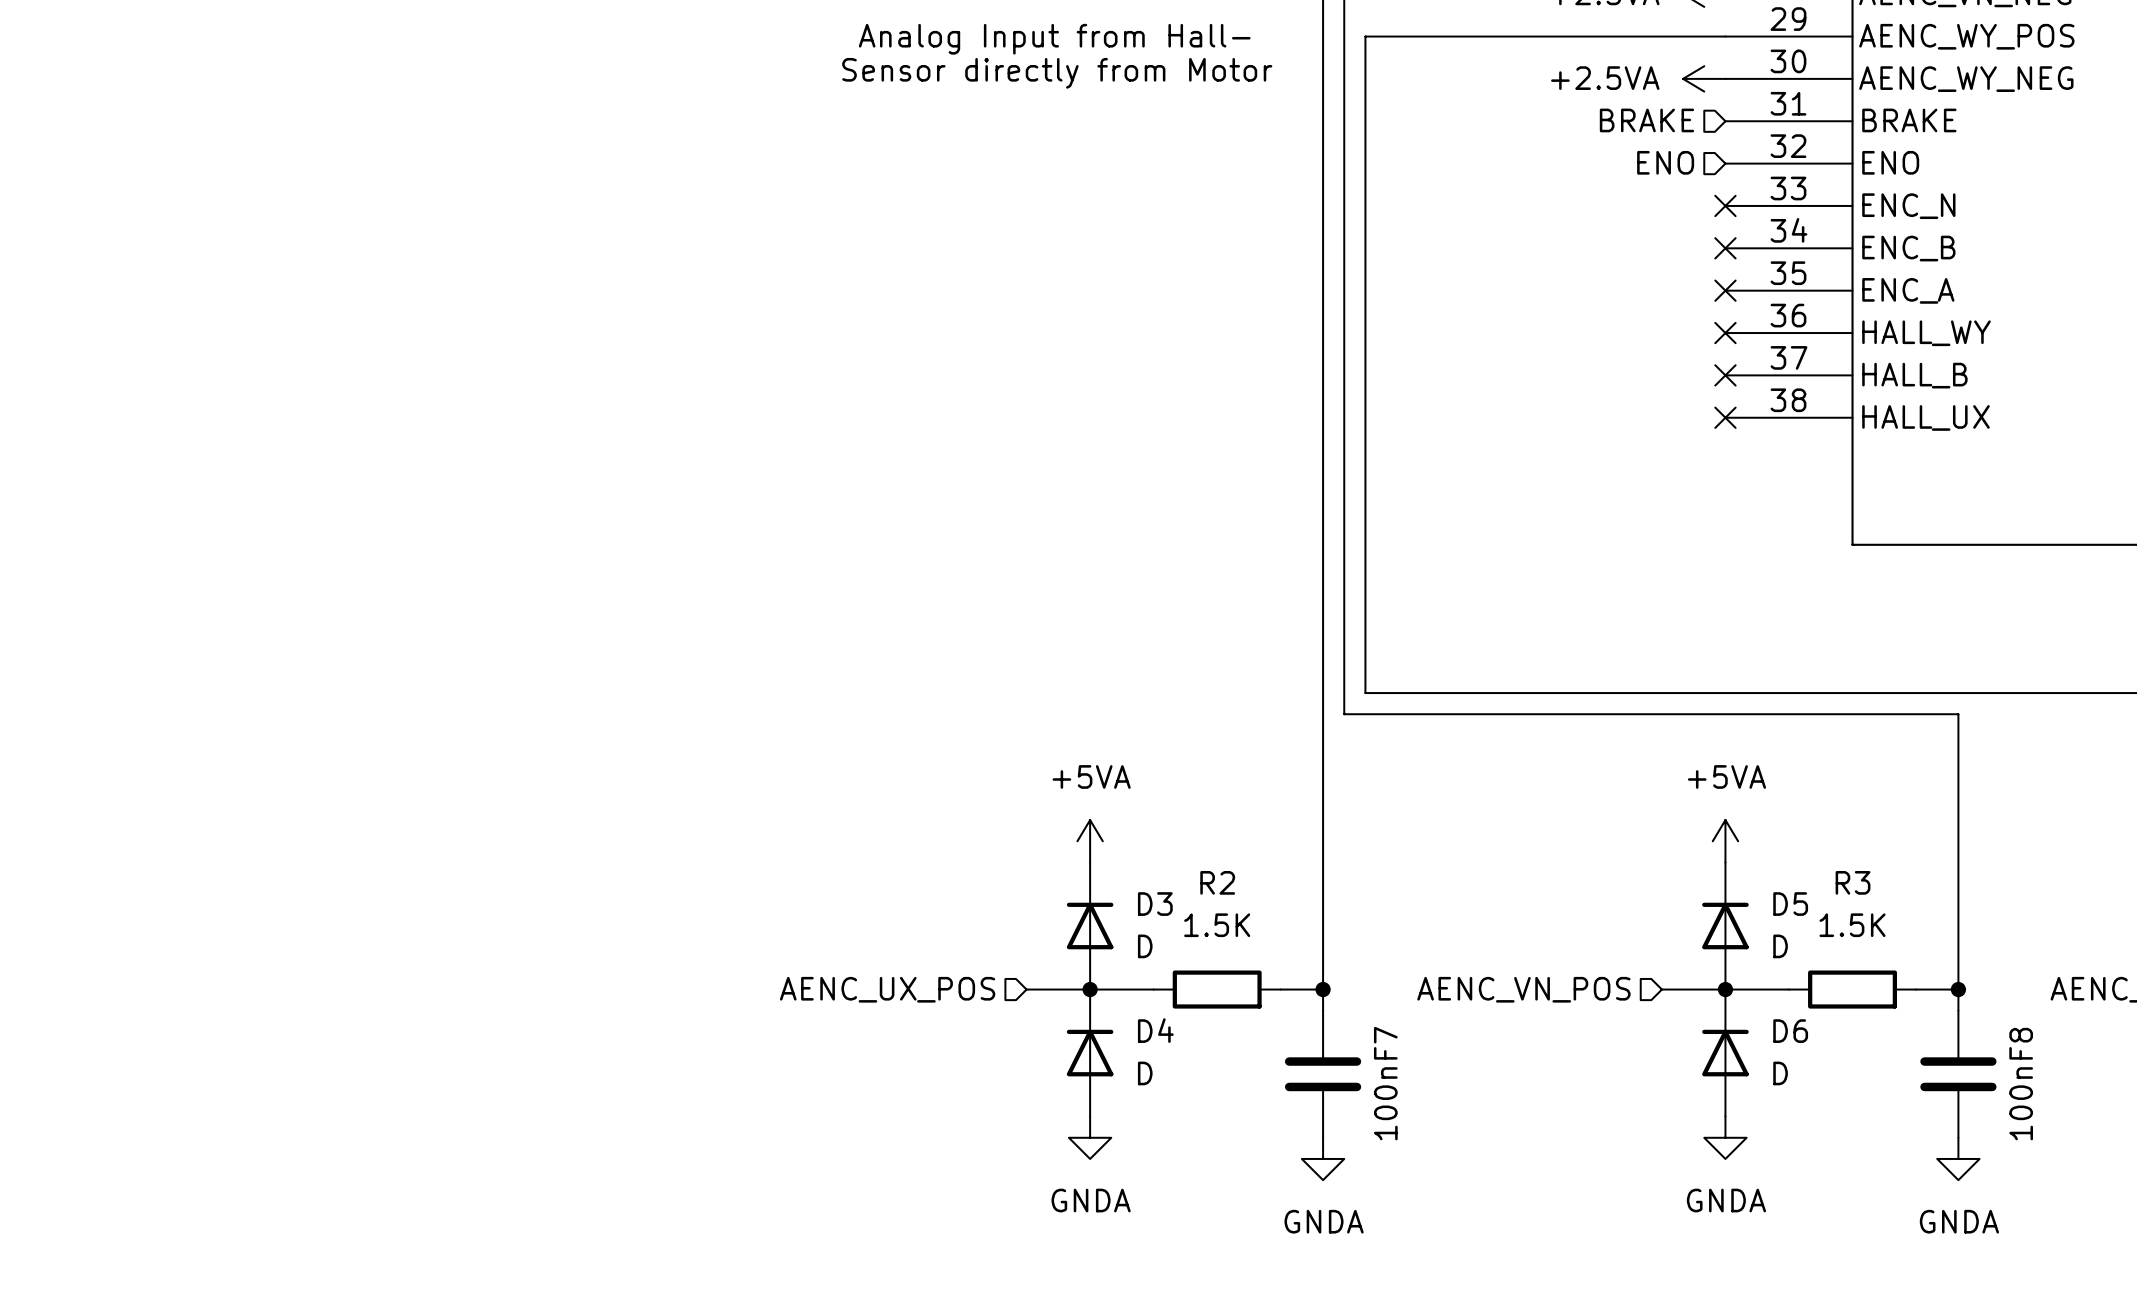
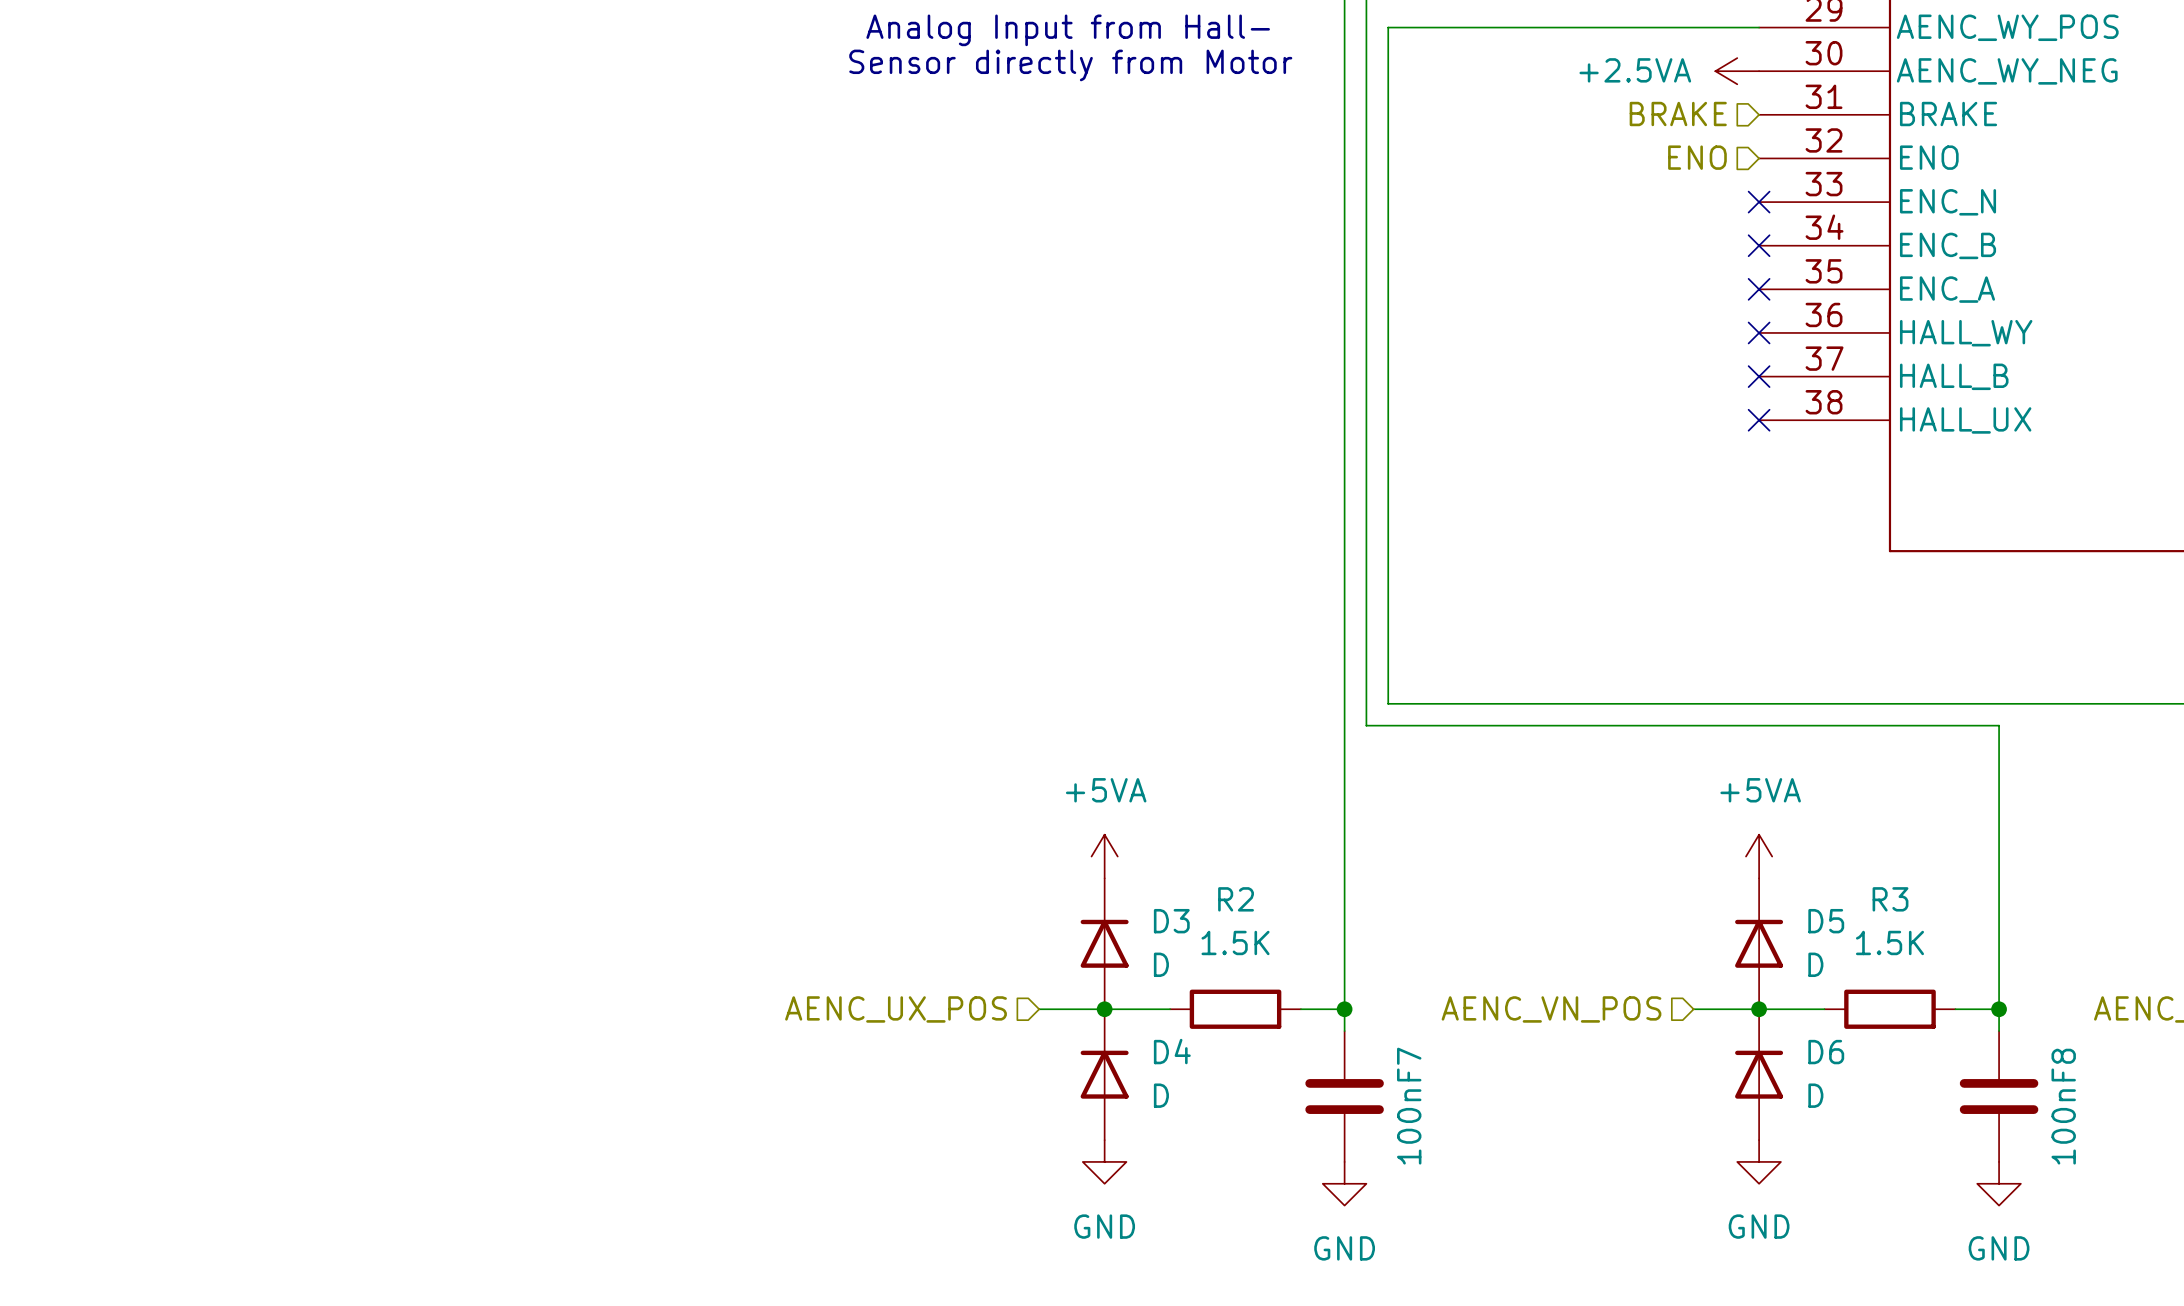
power symbol: GNDA (1090, 1137) -> GND (1104, 1161)
power symbol: GNDA (1725, 1137) -> GND (1759, 1161)
power symbol: GNDA (1323, 1158) -> GND (1344, 1183)
power symbol: GNDA (1958, 1158) -> GND (1999, 1183)

